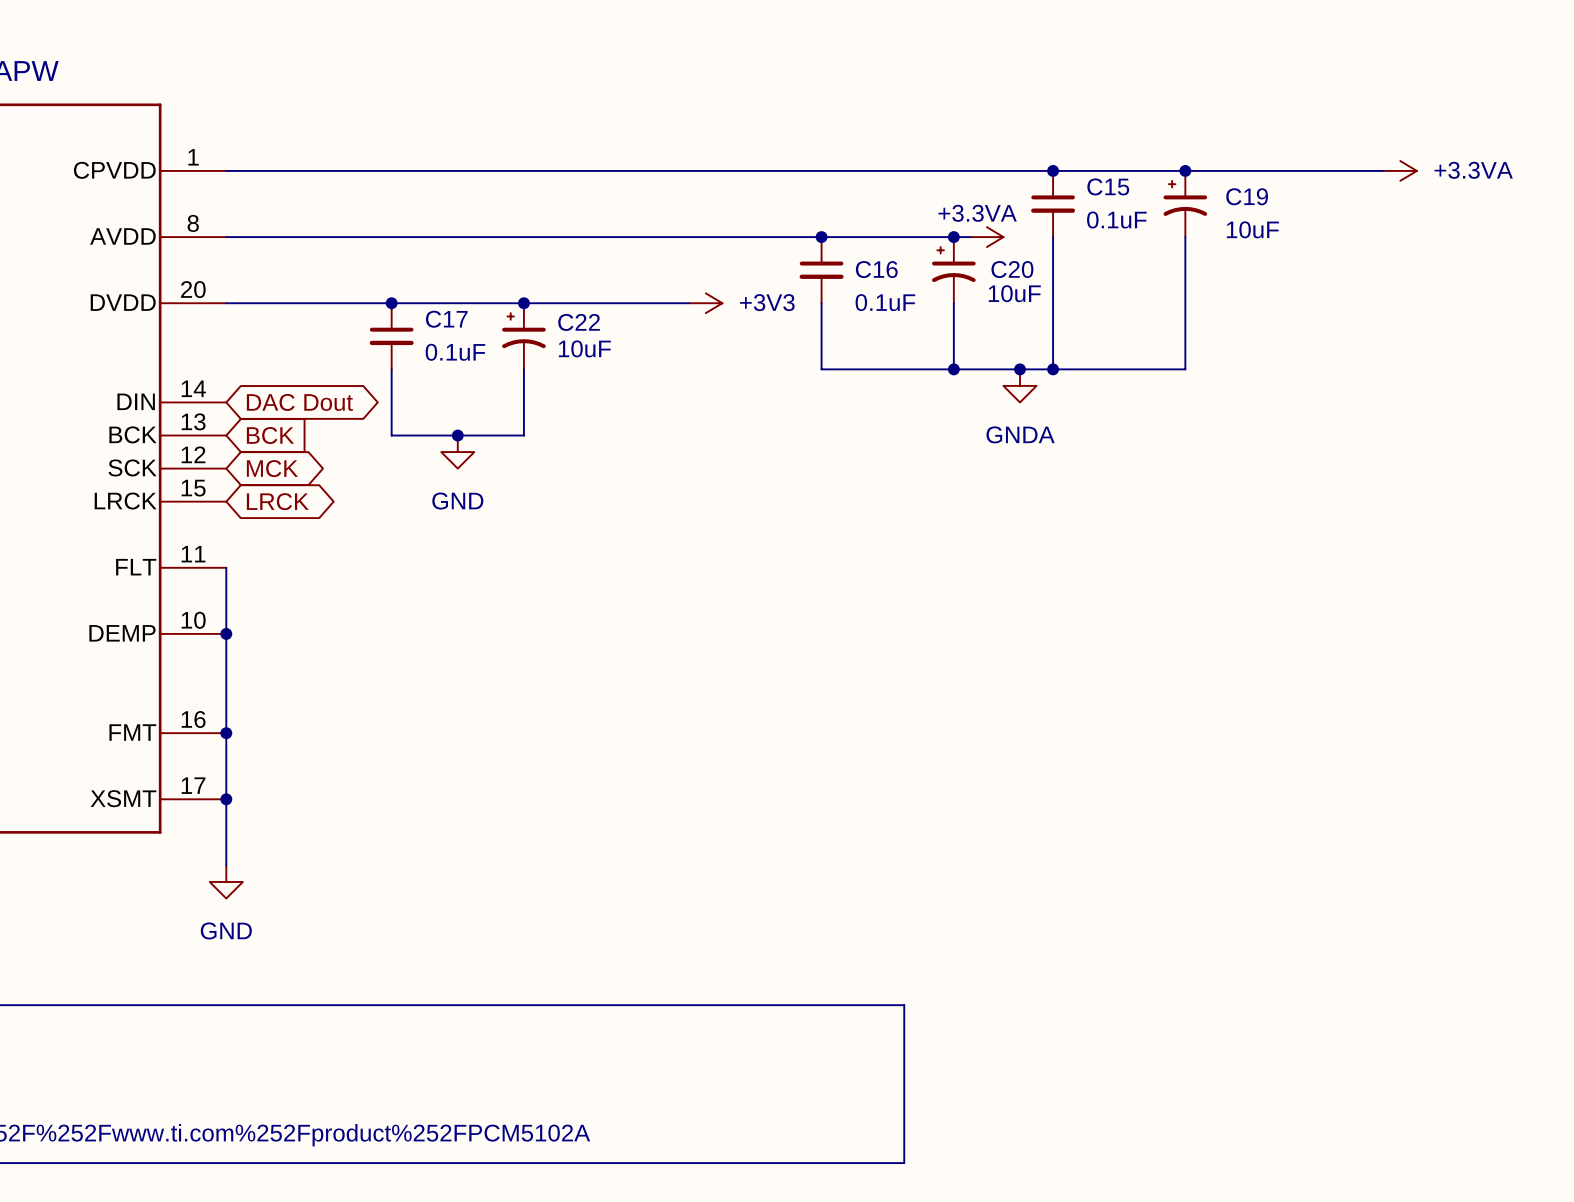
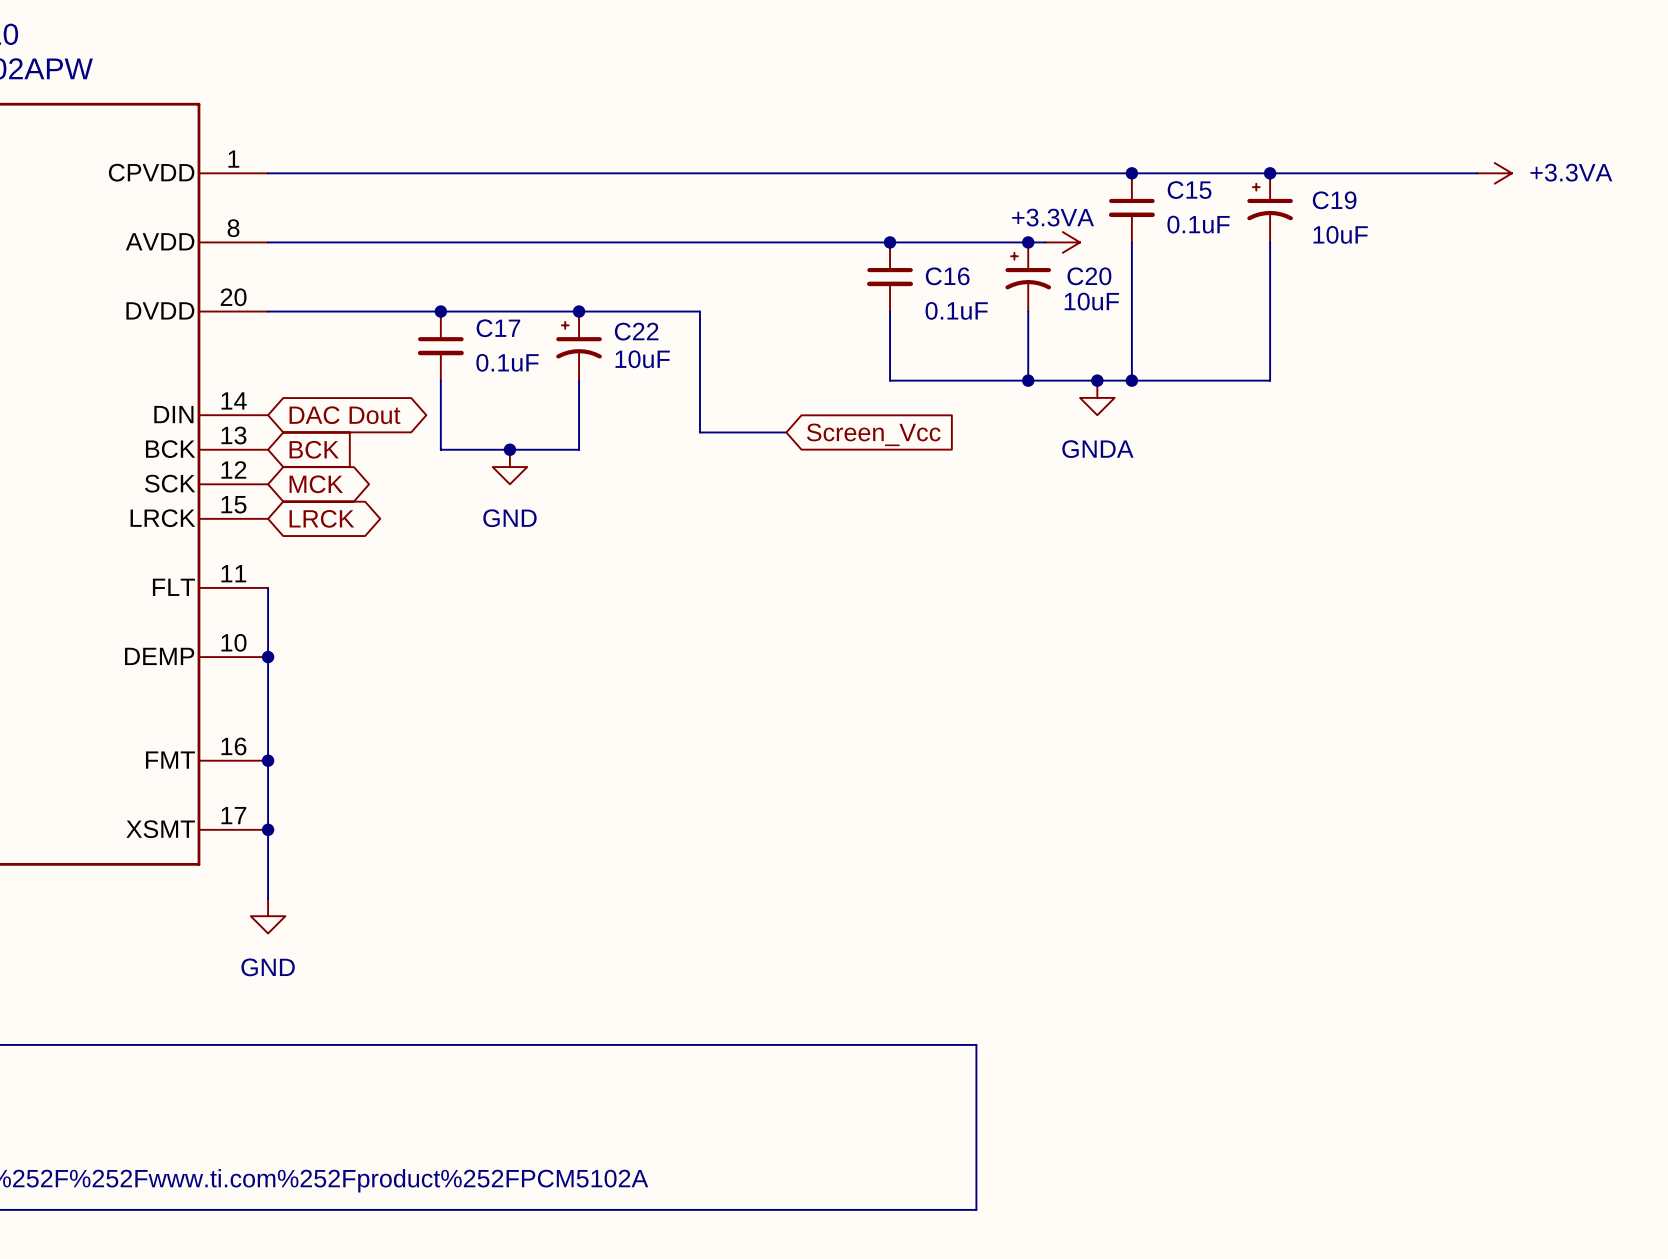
wire: (639, 303) (689, 303) -> (699, 311) (699, 432) (786, 432)
power symbol: +3V3 (705, 303) -> none
global label: none -> Screen_Vcc (873, 434)

